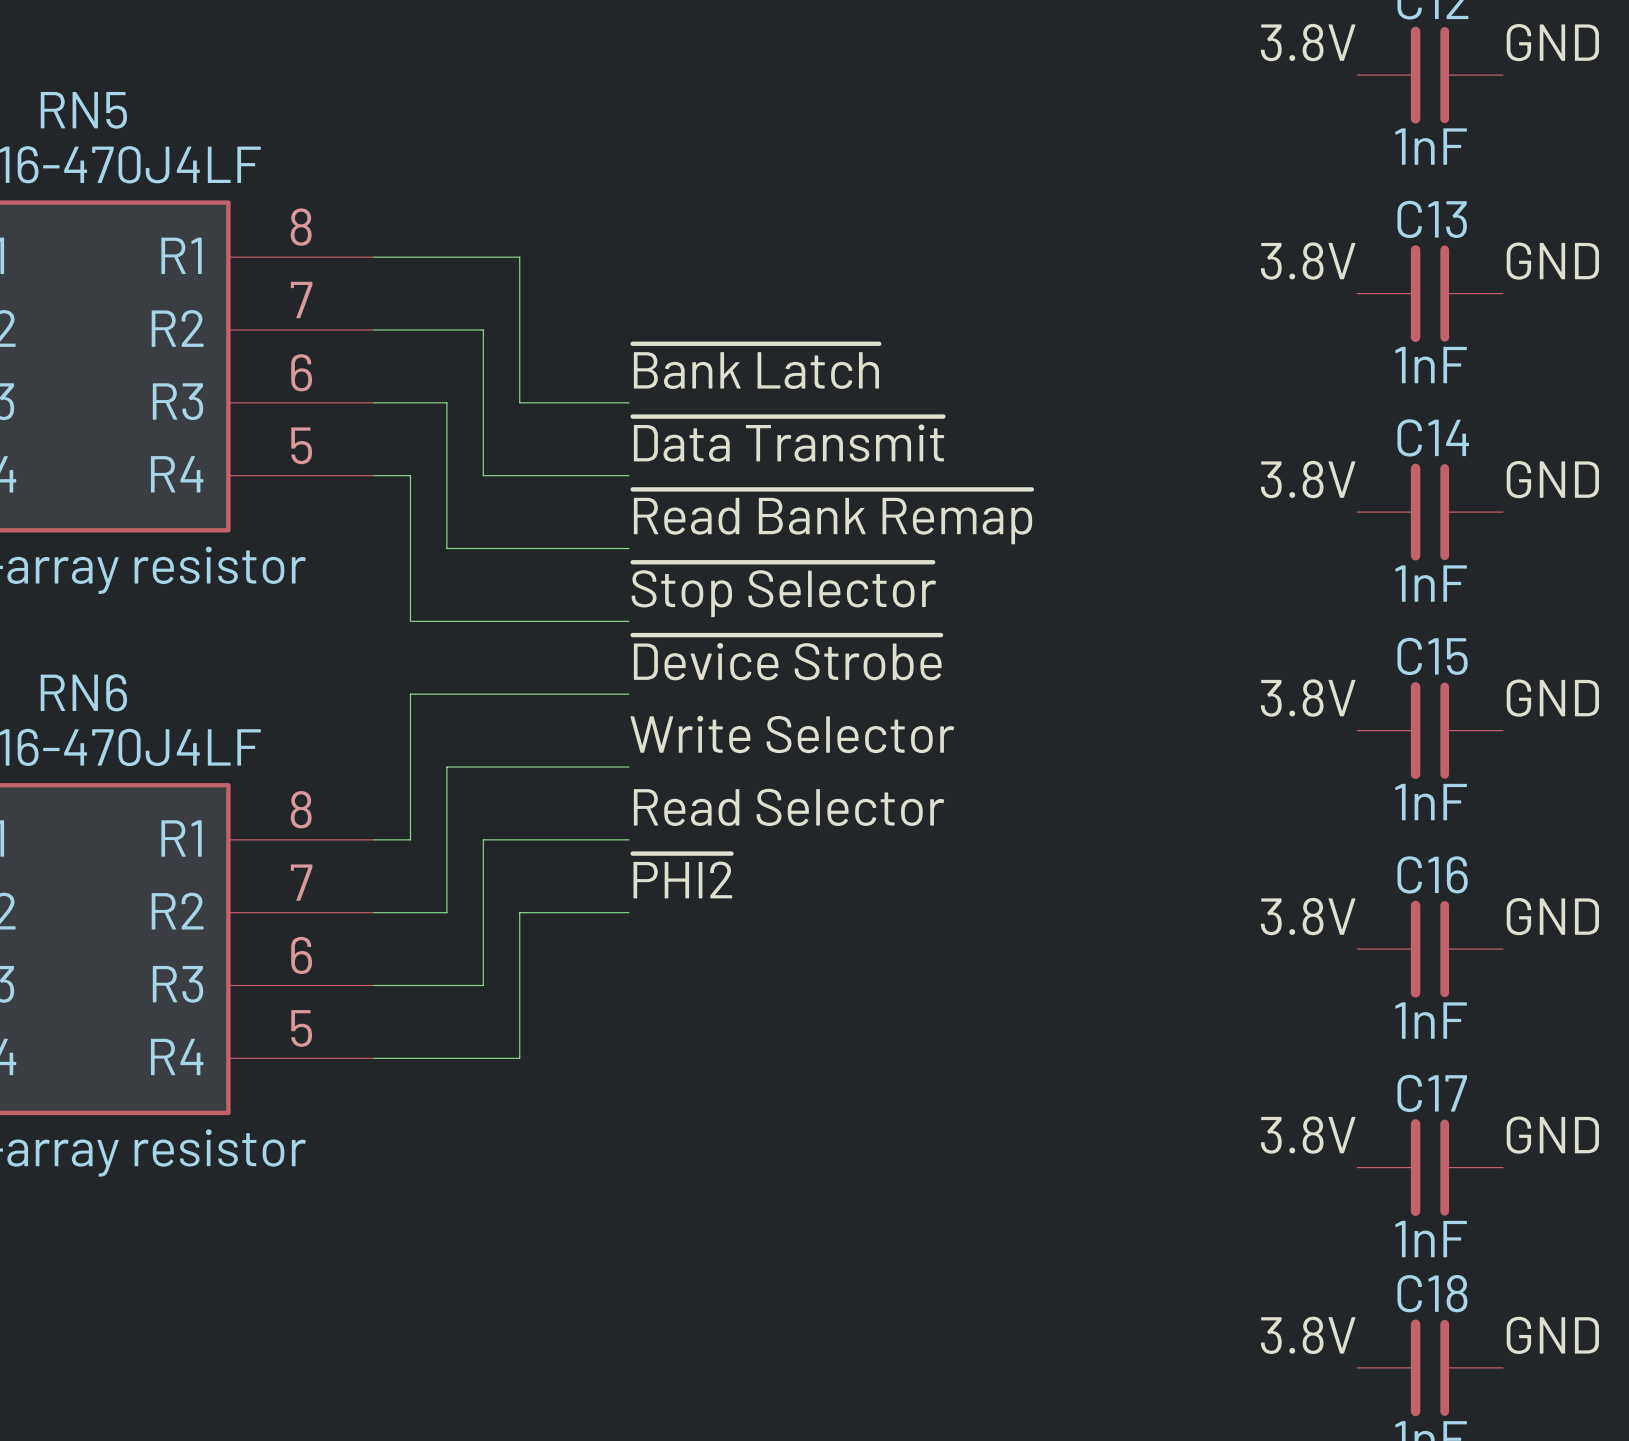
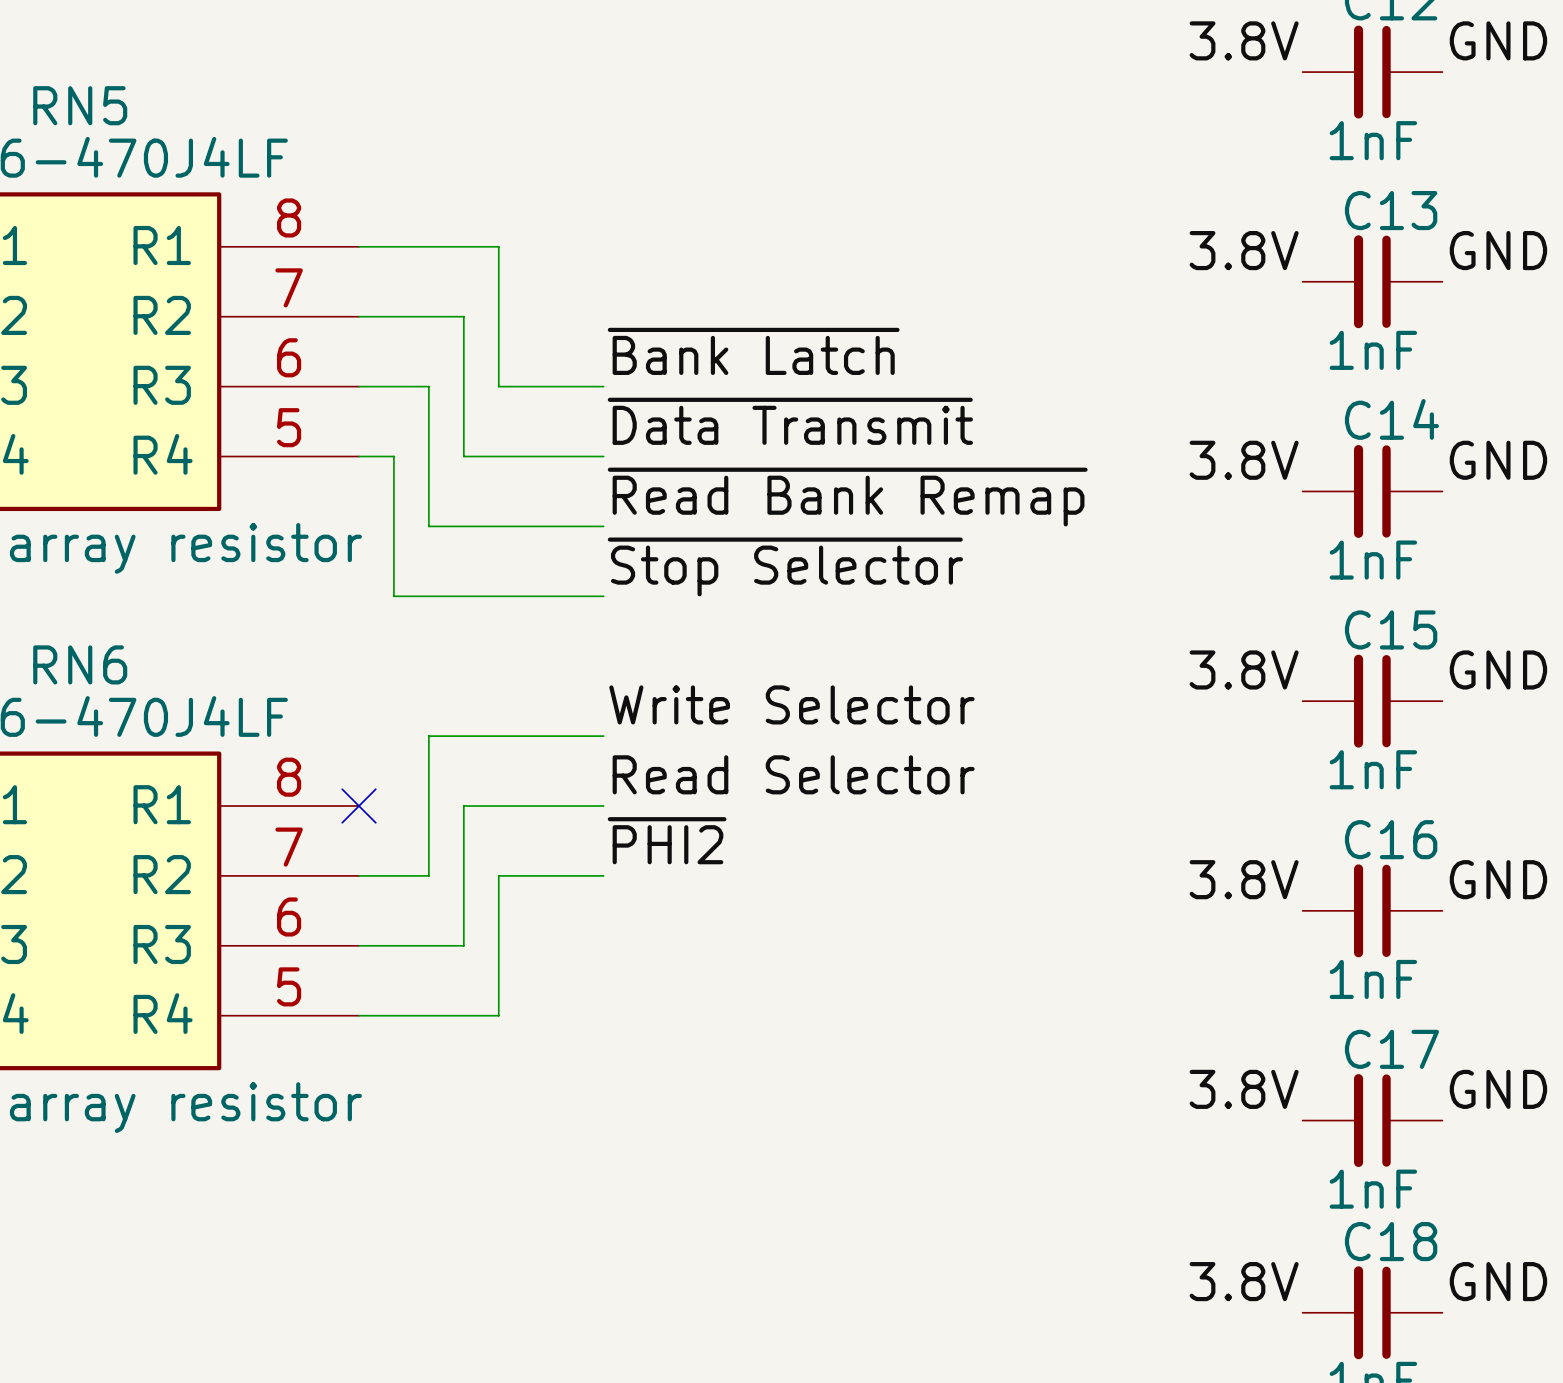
label: ~{Device Strobe} (787, 657) -> none
wire: (628, 694) (410, 694) (410, 839) (374, 839) -> none
no-connect mark: none -> (358, 806)

